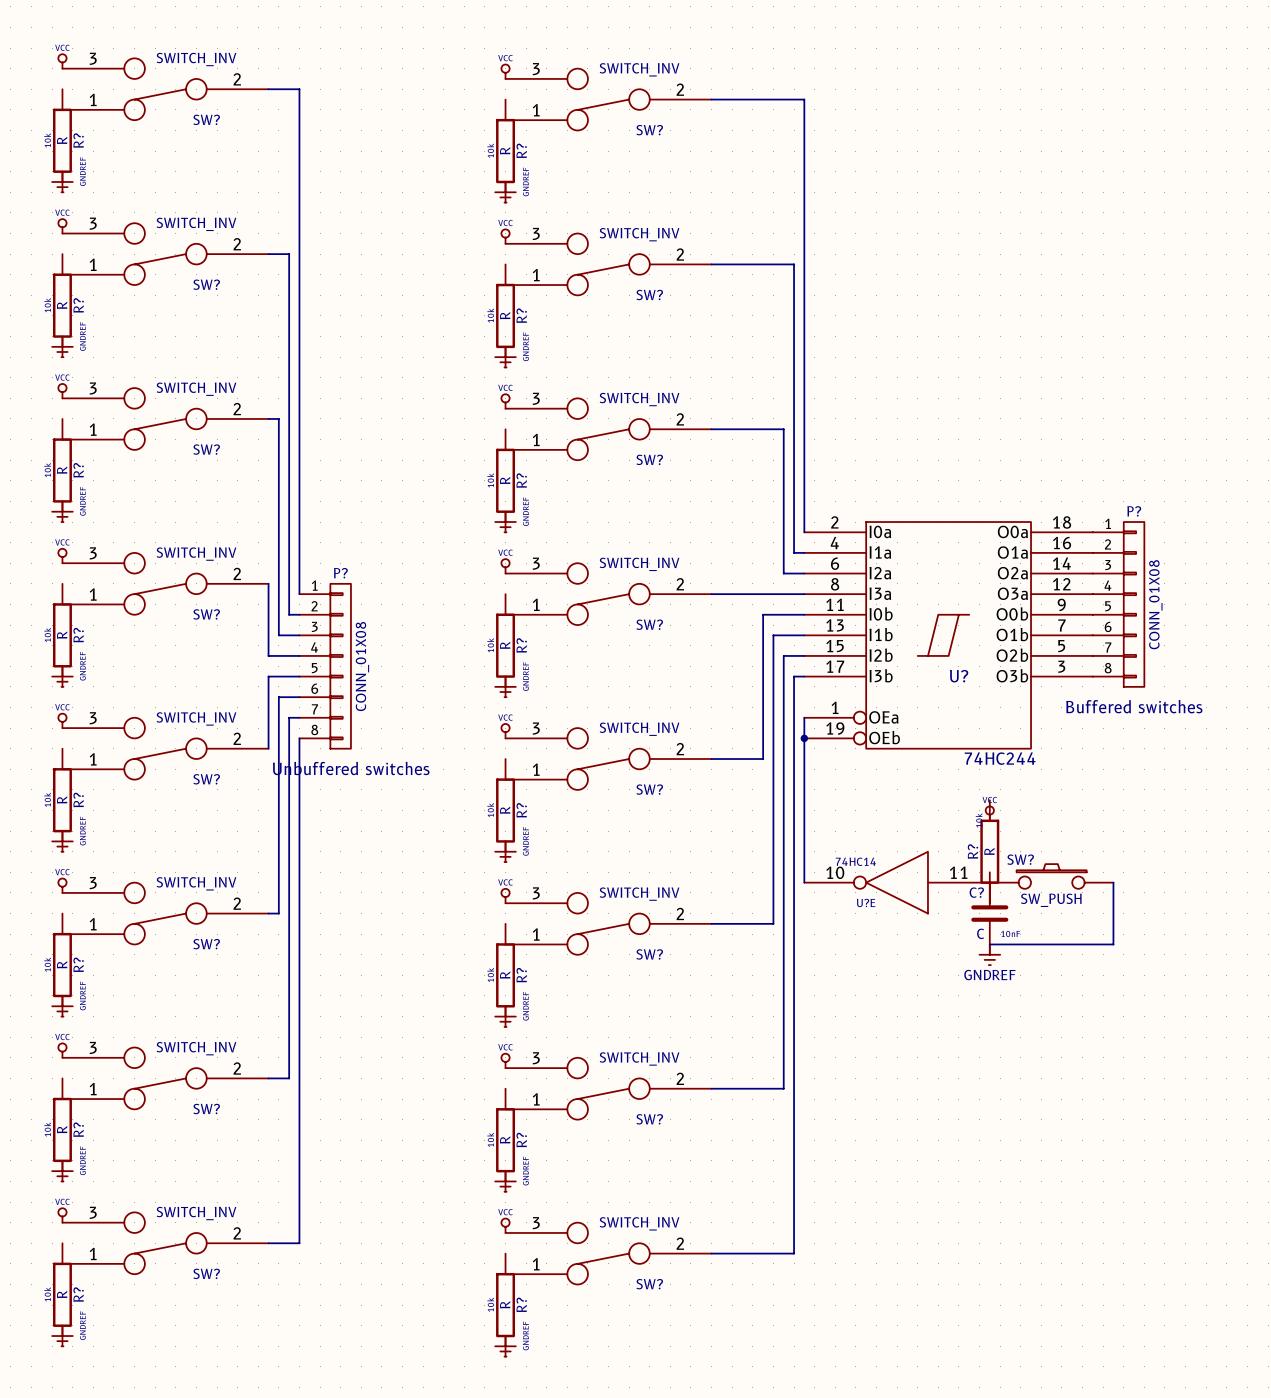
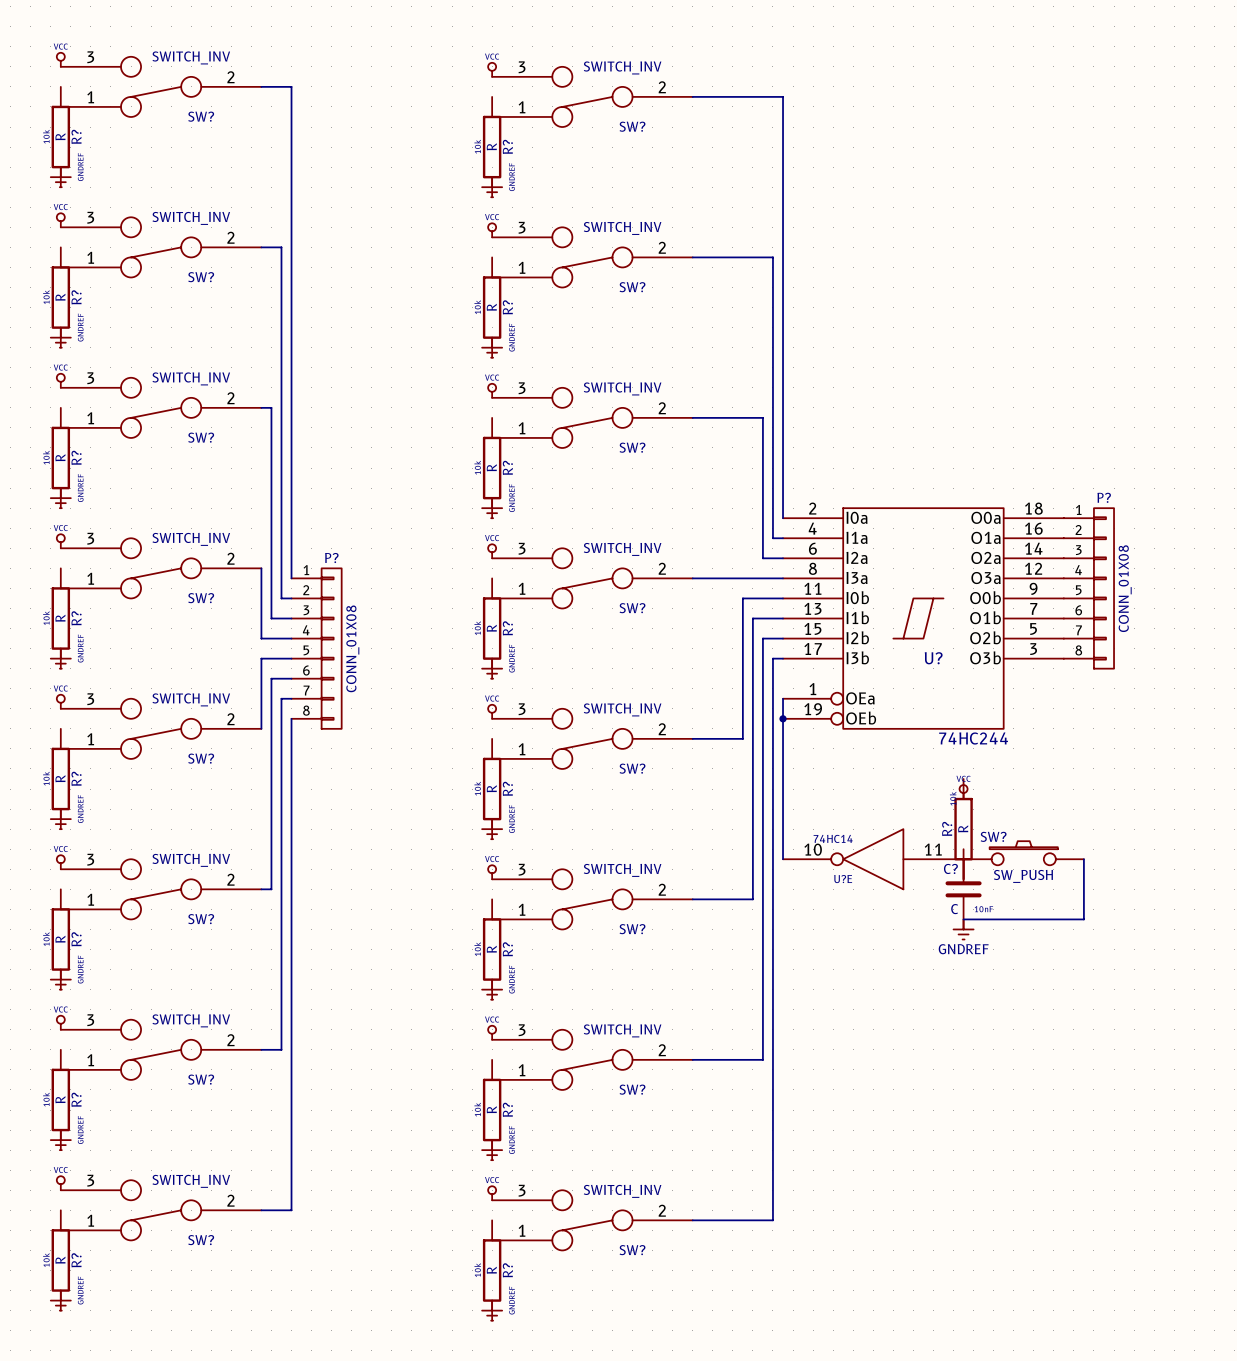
P? text: Buffered switches (1134, 706) -> none
P? text: Unbuffered switches (351, 768) -> none

